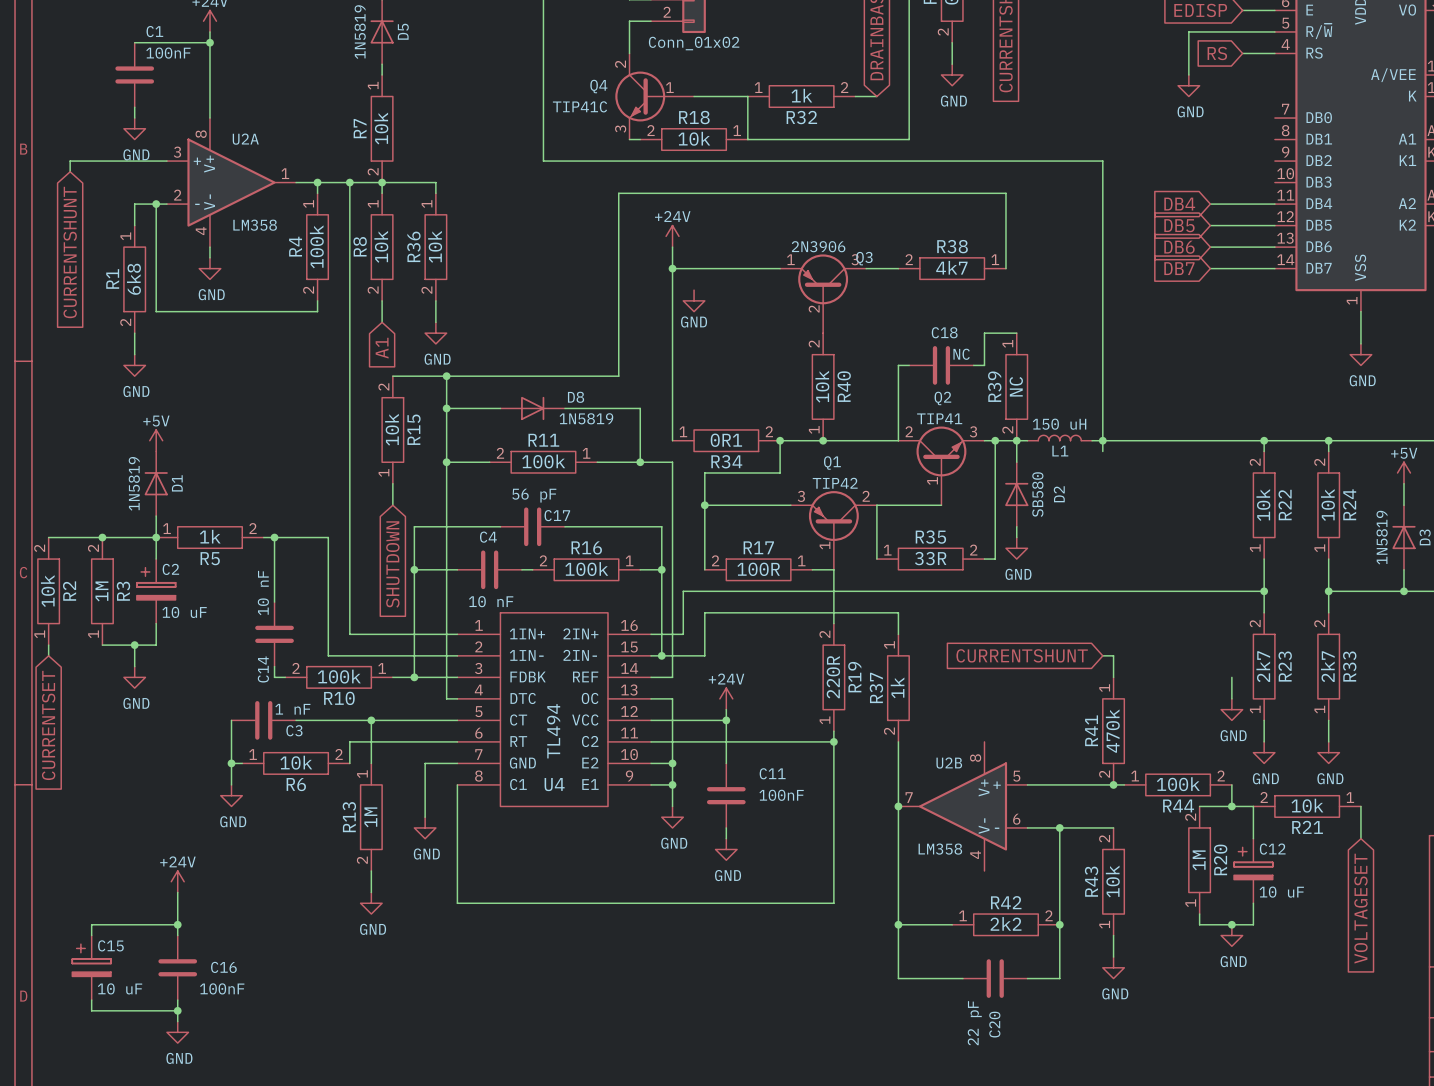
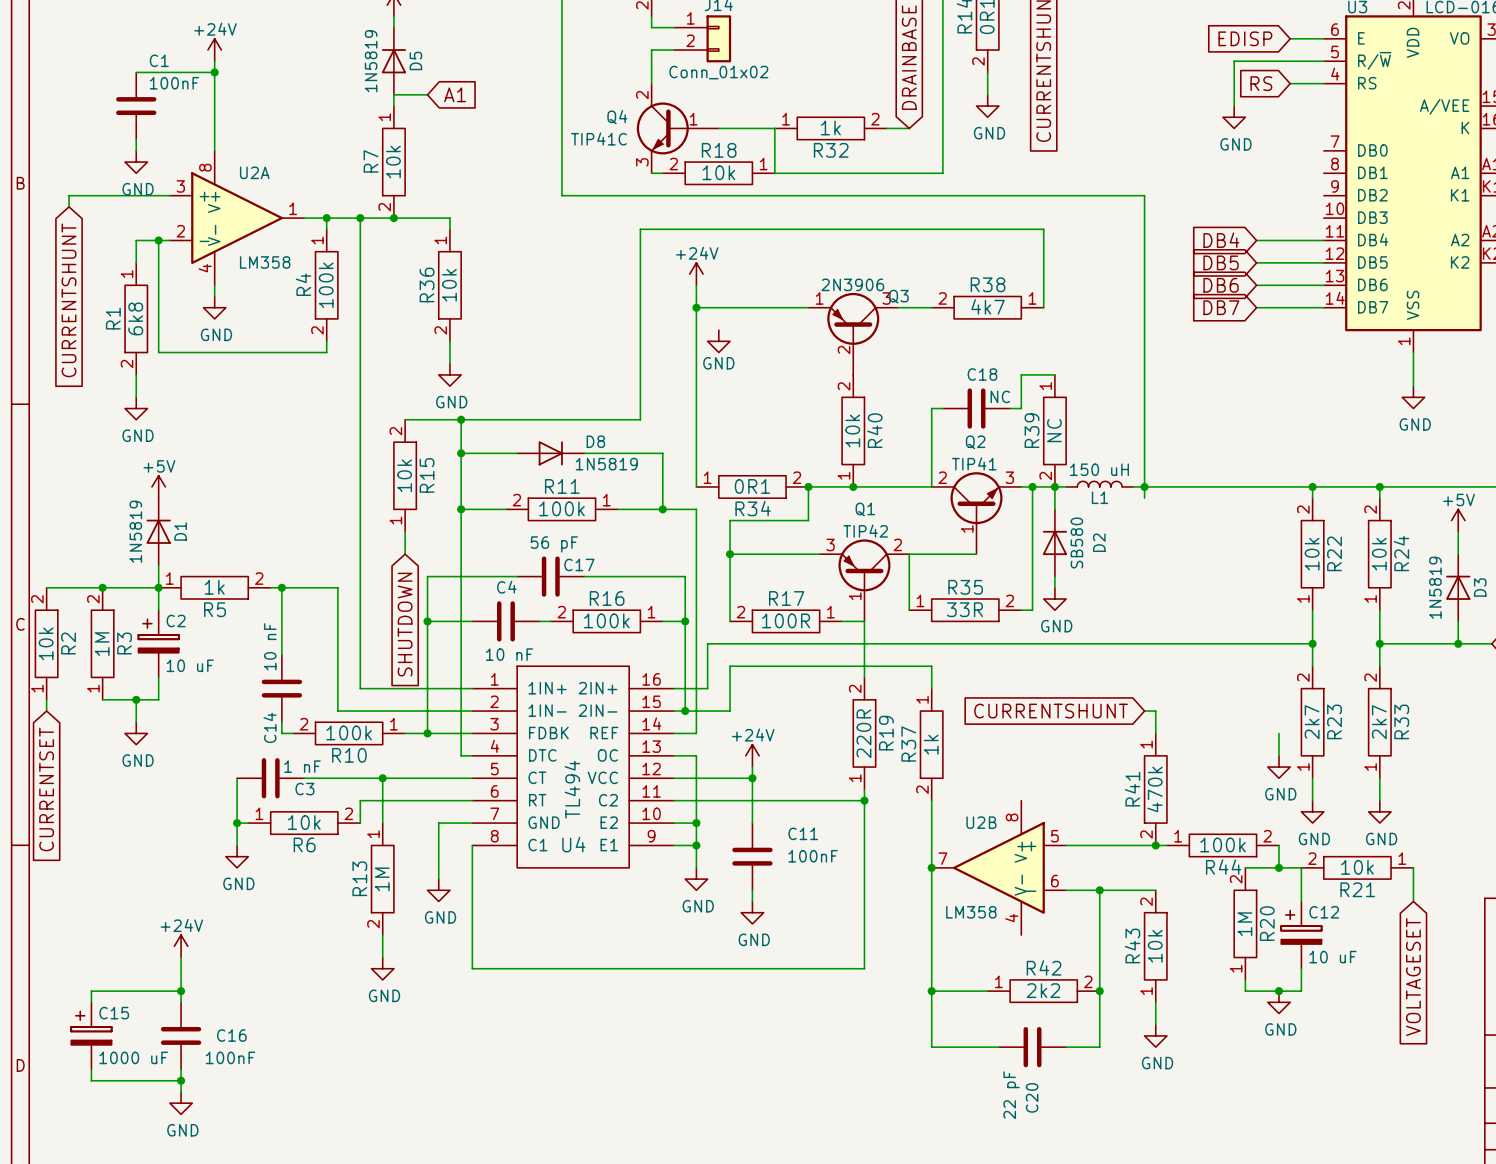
wire: none -> (393, 94) (427, 94)
global label: none -> A1 (455, 94)
wire: (382, 182) (382, 193) -> none
R8: 10k (382, 247) -> none
wire: (382, 300) (382, 322) -> none
global label: A1 (382, 348) -> none
C15 value: 10 uF (120, 988) -> 1000 uF (133, 1057)

